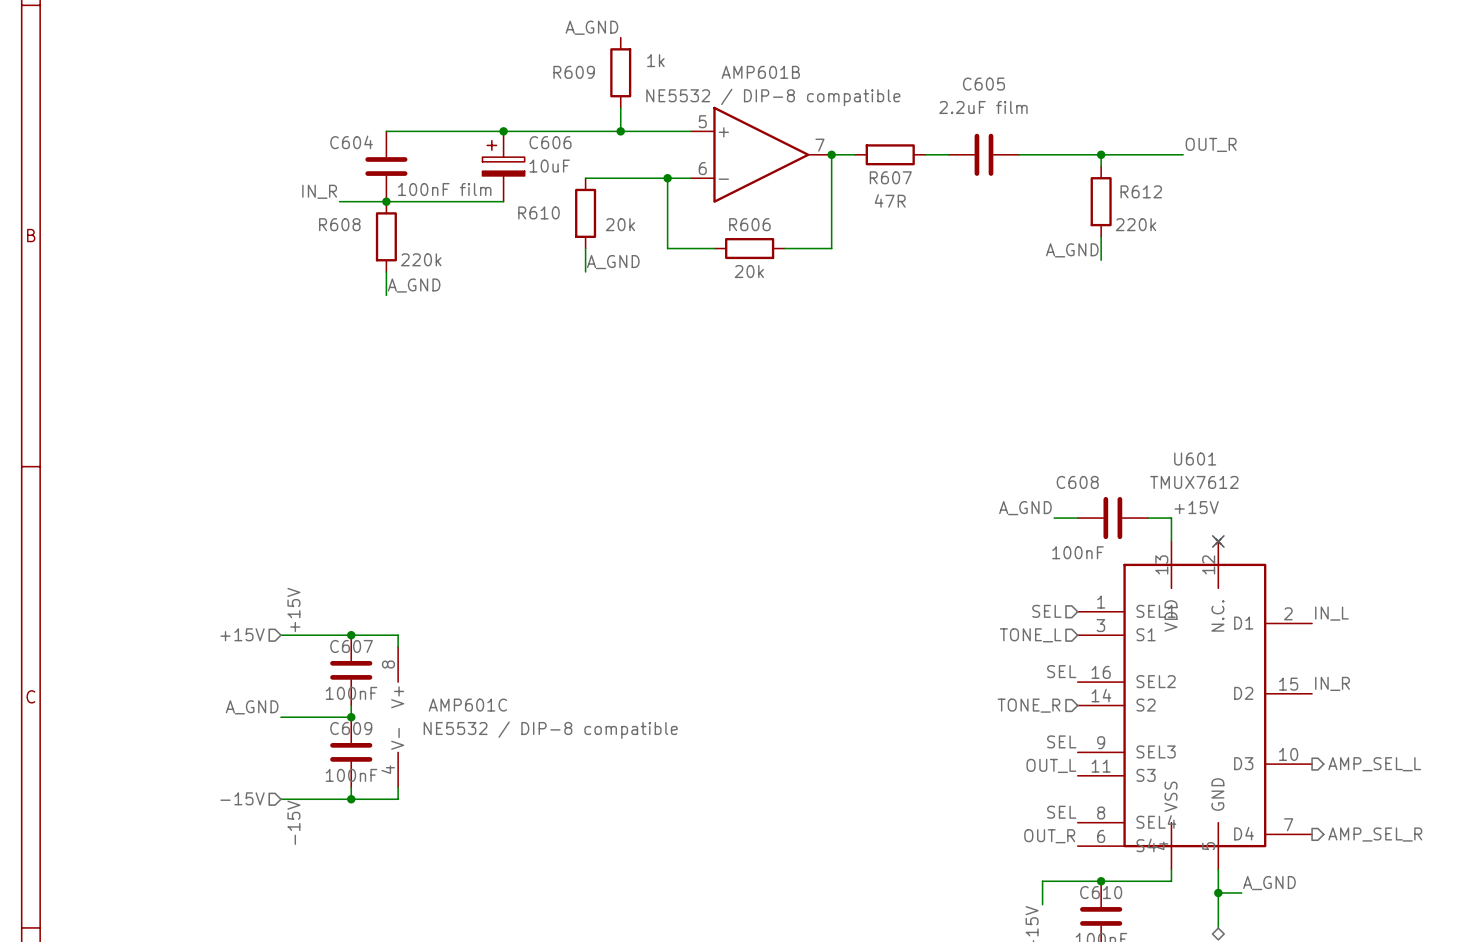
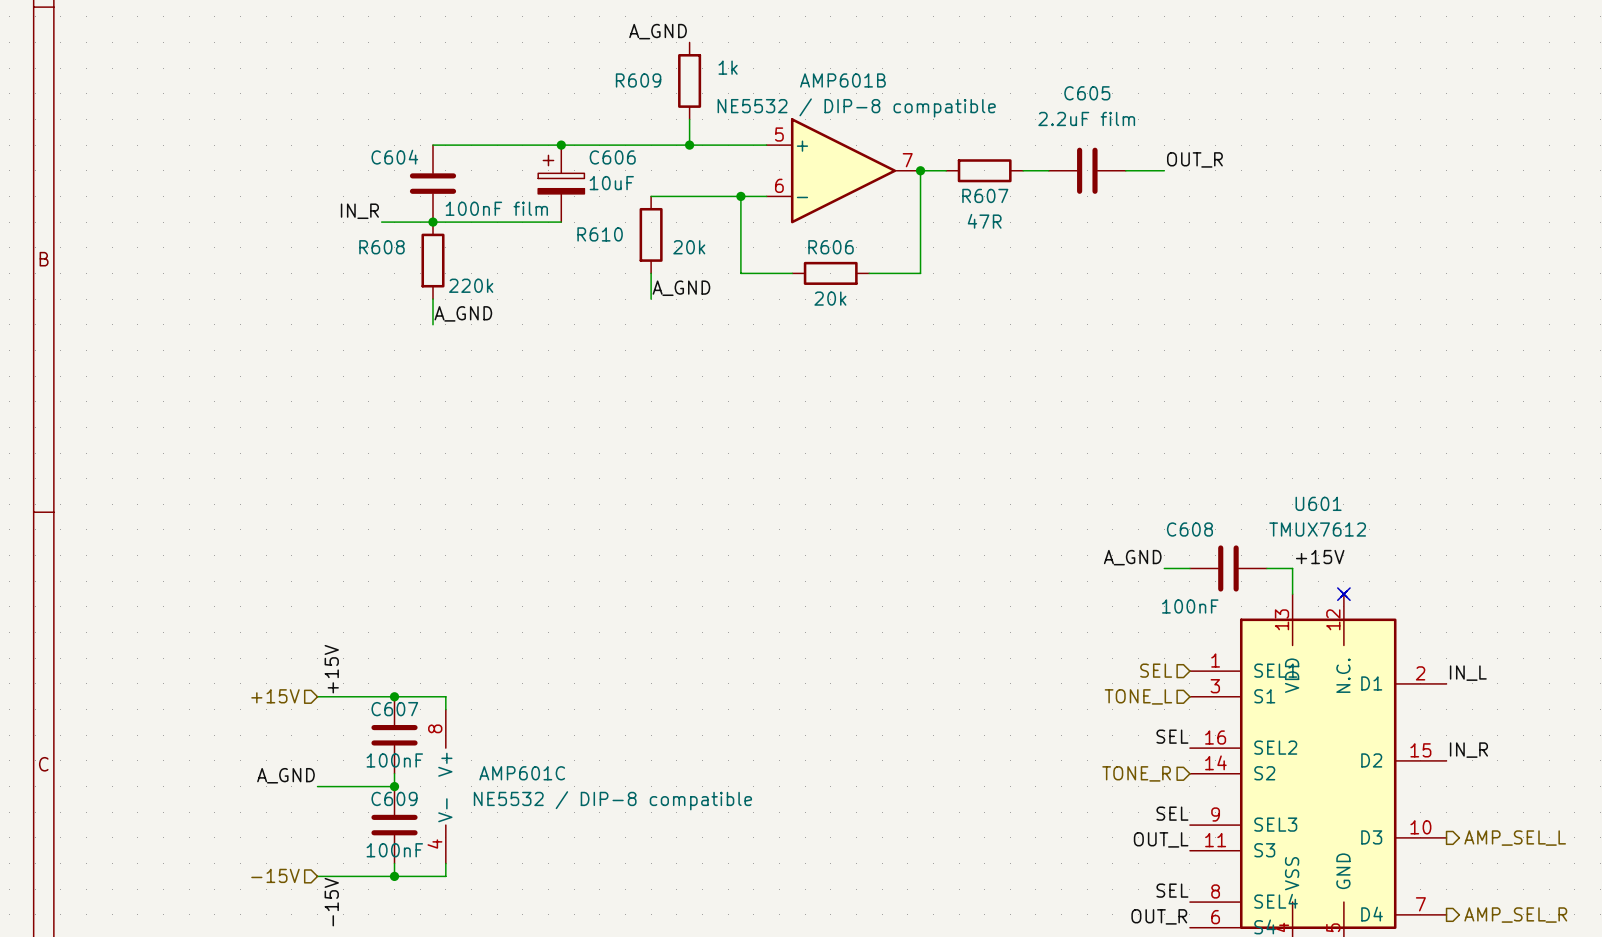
label position: OUT_R (1211, 144) -> OUT_R (1194, 159)
wire: (1054, 154) (1183, 154) -> none
wire: (1101, 154) (1101, 166) -> none
junction: (1101, 154) -> none
R612: 220k (1101, 201) -> none
wire: (1101, 236) (1101, 260) -> none
label: A_GND (1072, 250) -> none

